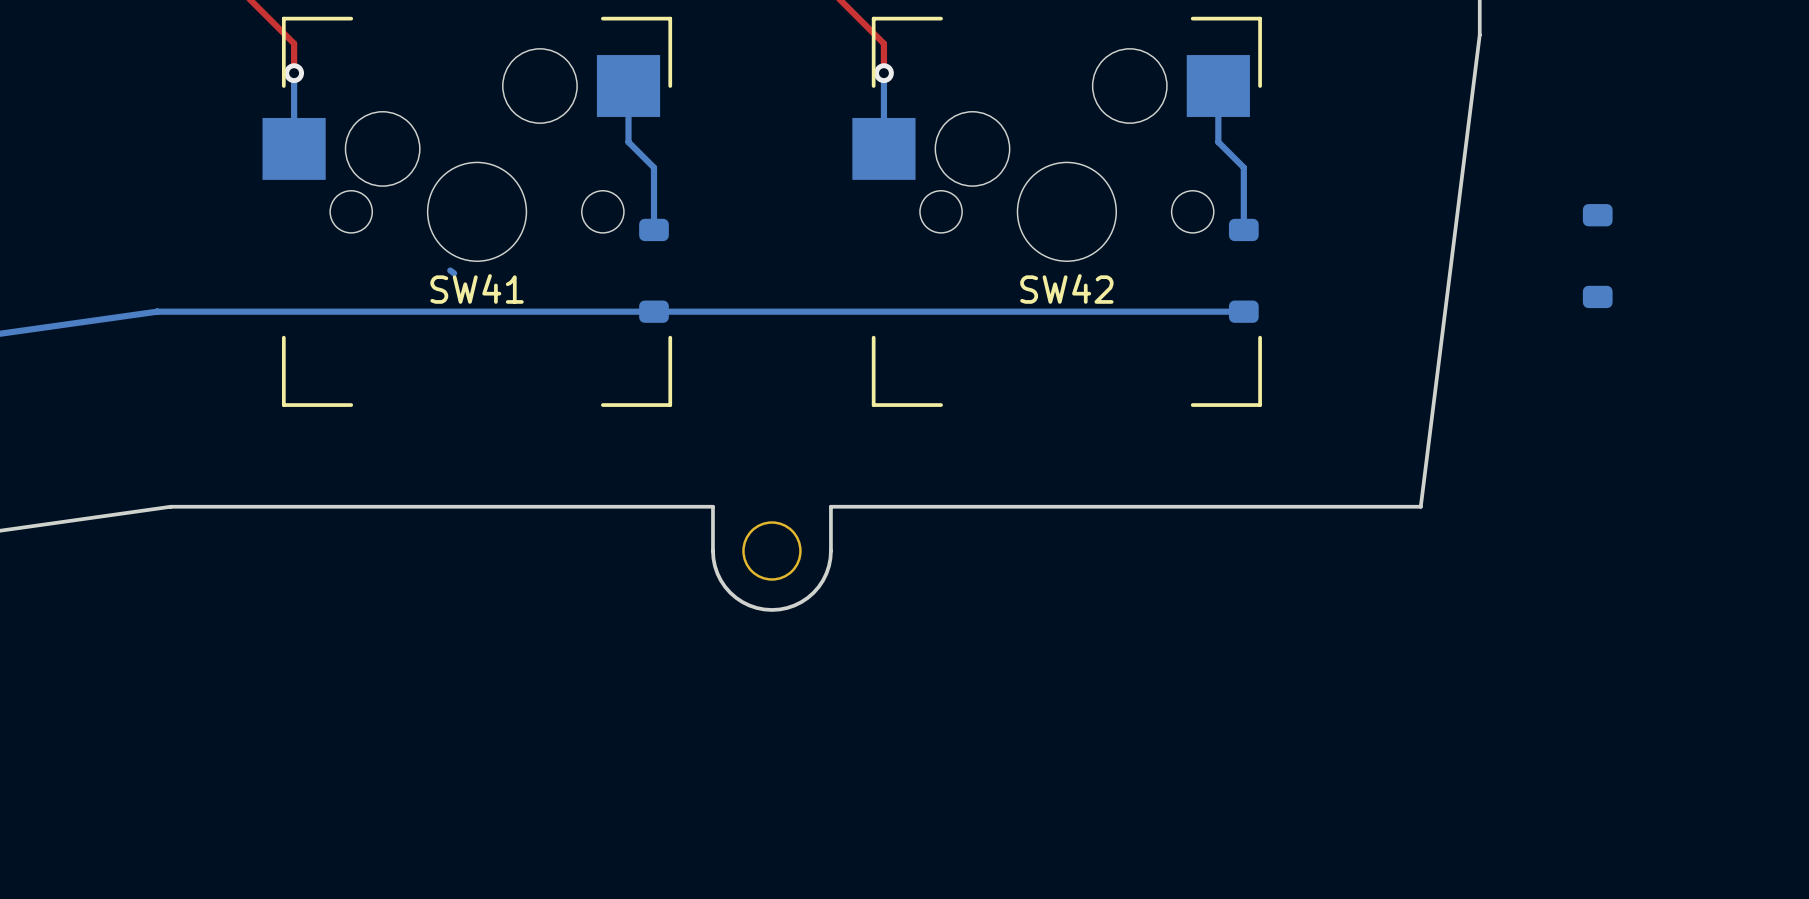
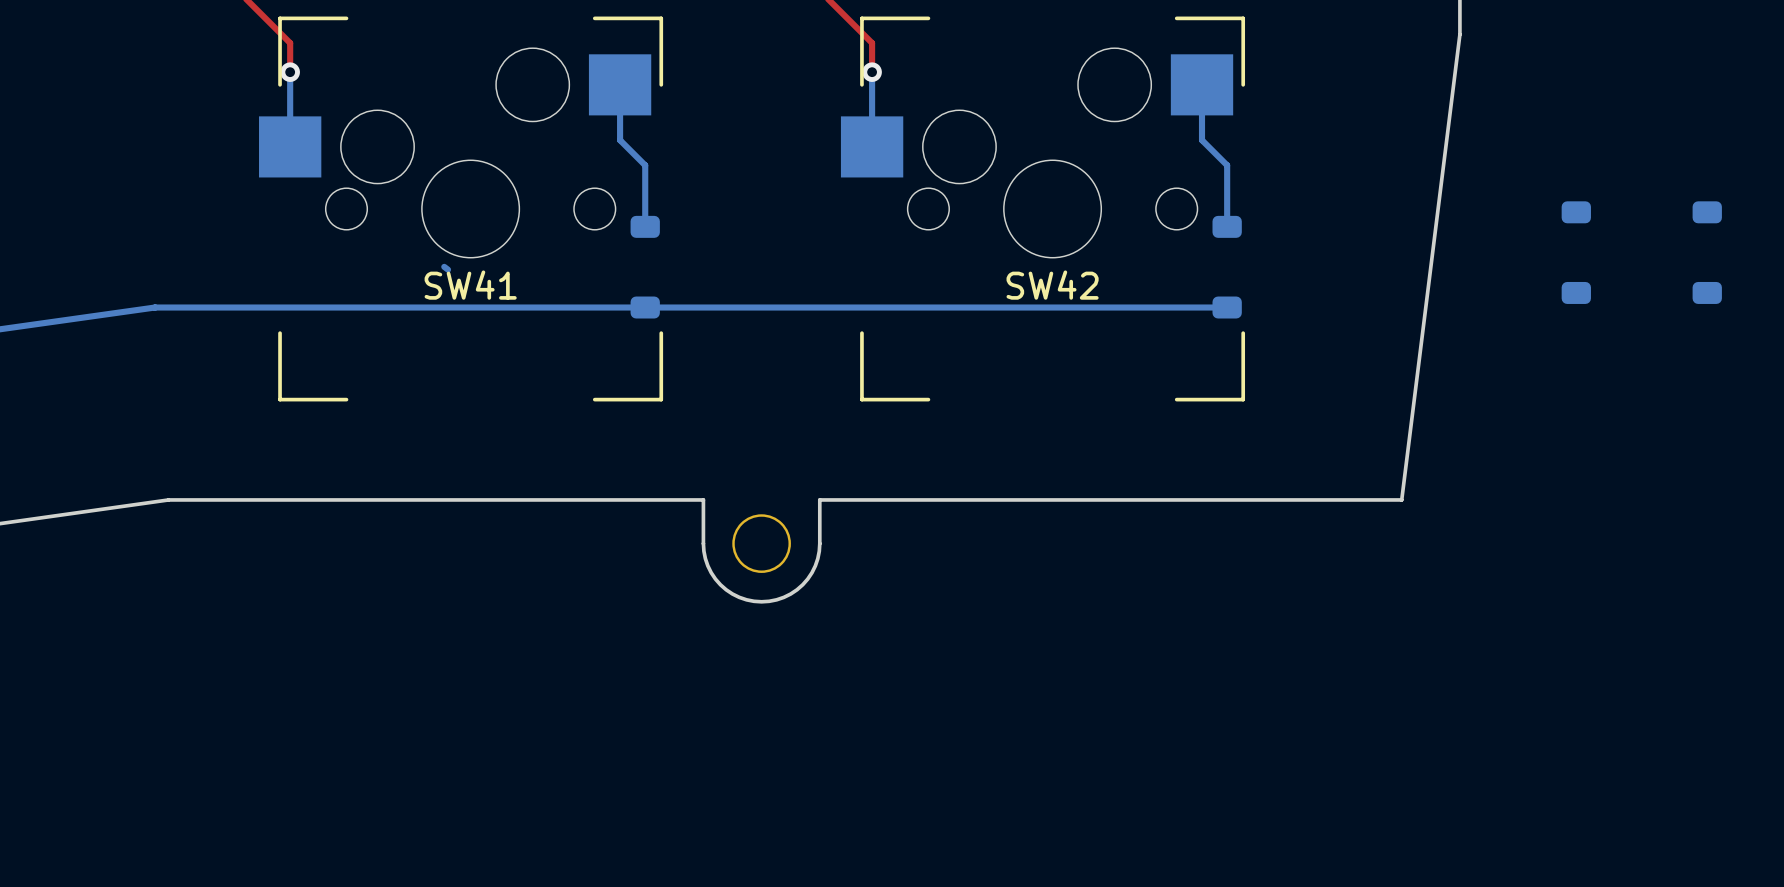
part: none -> (1707, 252)

